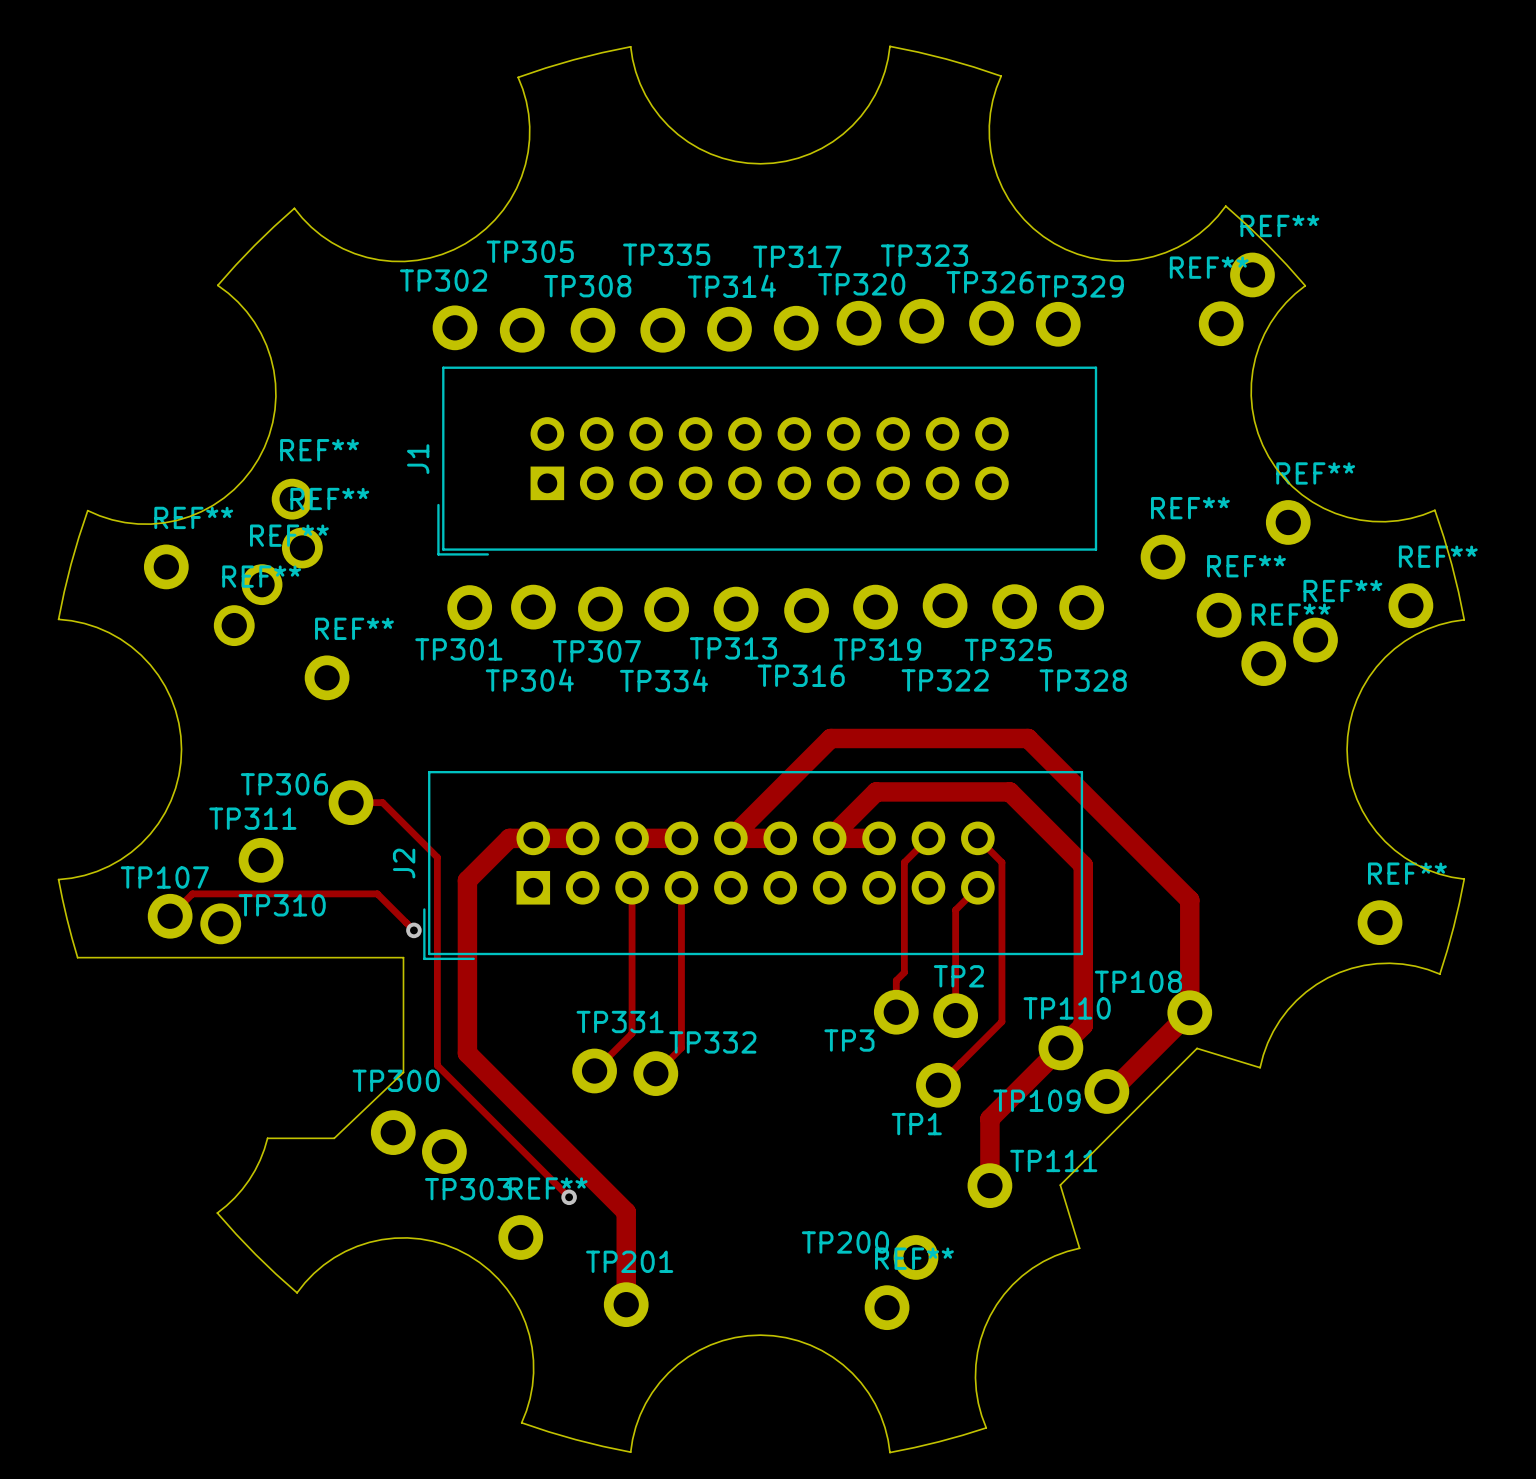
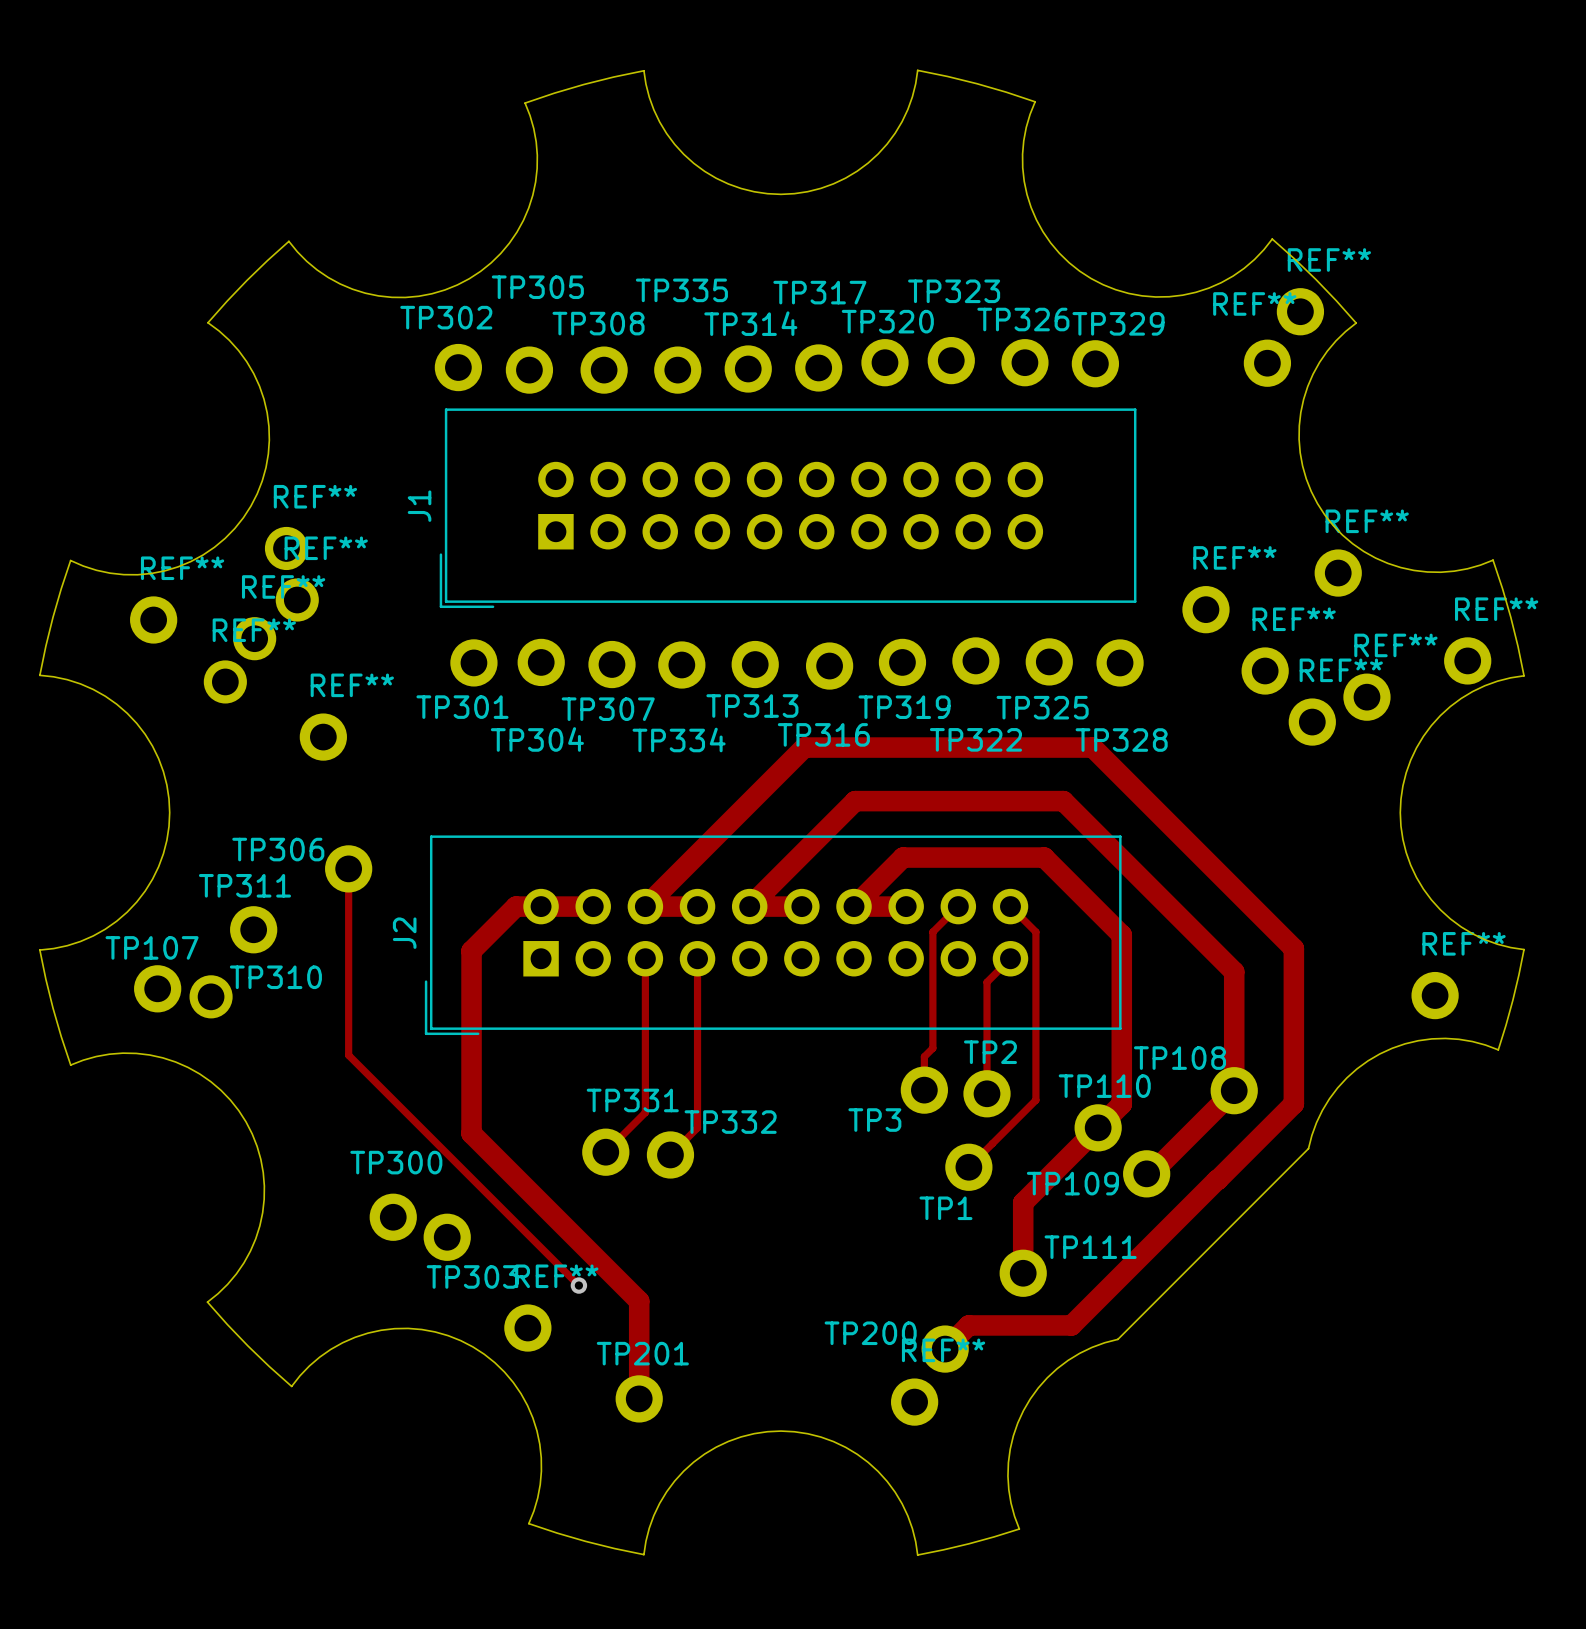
board edge: (1305, 285) (1277, 312) (1264, 334) (1255, 357) (1251, 383) (1252, 408) (1262, 445) (1275, 467) (1292, 486) (1312, 502) (1335, 513) (1360, 520) (1385, 521) (1410, 518) (1434, 510) (1451, 564) (1464, 619) (1427, 629) (1404, 641) (1385, 657) (1368, 677) (1356, 699) (1347, 736) (1347, 762) (1352, 787) (1362, 810) (1376, 832) (1394, 850) (1415, 864) (1439, 874) (1464, 879) (1453, 927) (1439, 974) (1415, 966) (1389, 963) (1364, 965) (1327, 977) (1306, 992) (1287, 1010) (1273, 1031) (1260, 1067) (1197, 1048) (1060, 1185) (1079, 1248) (1055, 1255) (1032, 1268) (1004, 1294) (990, 1315) (980, 1339) (975, 1365) (976, 1390) (986, 1427) (938, 1441) (889, 1452) (884, 1427) (875, 1403) (861, 1382) (843, 1364) (821, 1350) (798, 1340) (773, 1335) (747, 1335) (722, 1340) (699, 1350) (668, 1373) (652, 1392) (640, 1415) (630, 1452) -> (1356, 323) (1327, 351) (1313, 374) (1303, 399) (1299, 425) (1300, 452) (1311, 491) (1324, 514) (1342, 535) (1363, 551) (1387, 563) (1413, 570) (1440, 572) (1467, 568) (1493, 560) (1510, 617) (1524, 675) (1484, 685) (1461, 698) (1440, 715) (1423, 736) (1410, 760) (1400, 799) (1400, 826) (1406, 852) (1416, 877) (1431, 899) (1450, 918) (1472, 933) (1497, 944) (1524, 949) (1512, 1000) (1498, 1049) (1459, 1039) (1418, 1040) (1379, 1053) (1346, 1077) (1322, 1110) (1308, 1148) (1117, 1339) (1091, 1347) (1068, 1360) (1038, 1387) (1017, 1423) (1008, 1462) (1008, 1489) (1019, 1529) (968, 1543) (917, 1555) (912, 1528) (902, 1503) (887, 1481) (868, 1462) (845, 1447) (820, 1437) (794, 1431) (767, 1431) (741, 1436) (716, 1447) (683, 1471) (666, 1491) (653, 1515) (643, 1554)
board edge: (58, 619) (97, 627) (120, 639) (141, 655) (158, 675) (171, 698) (180, 736) (180, 762) (175, 788) (165, 812) (150, 834) (131, 852) (109, 866) (84, 875) (58, 879) (77, 957) (403, 957) (403, 1072) (334, 1138) (267, 1138) (260, 1160) (249, 1180) (234, 1197) (217, 1213) (255, 1254) (297, 1292) (313, 1273) (334, 1257) (357, 1246) (381, 1239) (407, 1237) (432, 1241) (457, 1249) (479, 1262) (506, 1289) (520, 1310) (529, 1334) (533, 1373) (530, 1398) (521, 1422) -> (39, 675) (80, 683) (105, 696) (127, 713) (145, 734) (158, 758) (168, 798) (168, 826) (163, 853) (152, 879) (136, 902) (116, 921) (93, 935) (67, 945) (39, 950) (53, 1008) (70, 1065) (109, 1054) (136, 1053) (162, 1057) (187, 1067) (210, 1081) (238, 1110) (252, 1133) (260, 1159) (264, 1185) (262, 1212) (255, 1238) (243, 1262) (227, 1284) (207, 1302) (247, 1345) (291, 1386) (309, 1365) (330, 1349) (368, 1333) (394, 1328) (435, 1331) (460, 1340) (484, 1354) (504, 1372) (527, 1405) (539, 1444) (540, 1484) (528, 1523)
track: (351, 802) (382, 802) (437, 857) (437, 1065) -> (348, 868) (348, 1055) (439, 1146)
track: none -> (645, 906) (804, 747) (1092, 747) (1293, 948) (1293, 1103) (1071, 1325) (968, 1325) (945, 1349)
track: (170, 916) (192, 893) (377, 893) (413, 930) -> none
via: (413, 930) -> none

